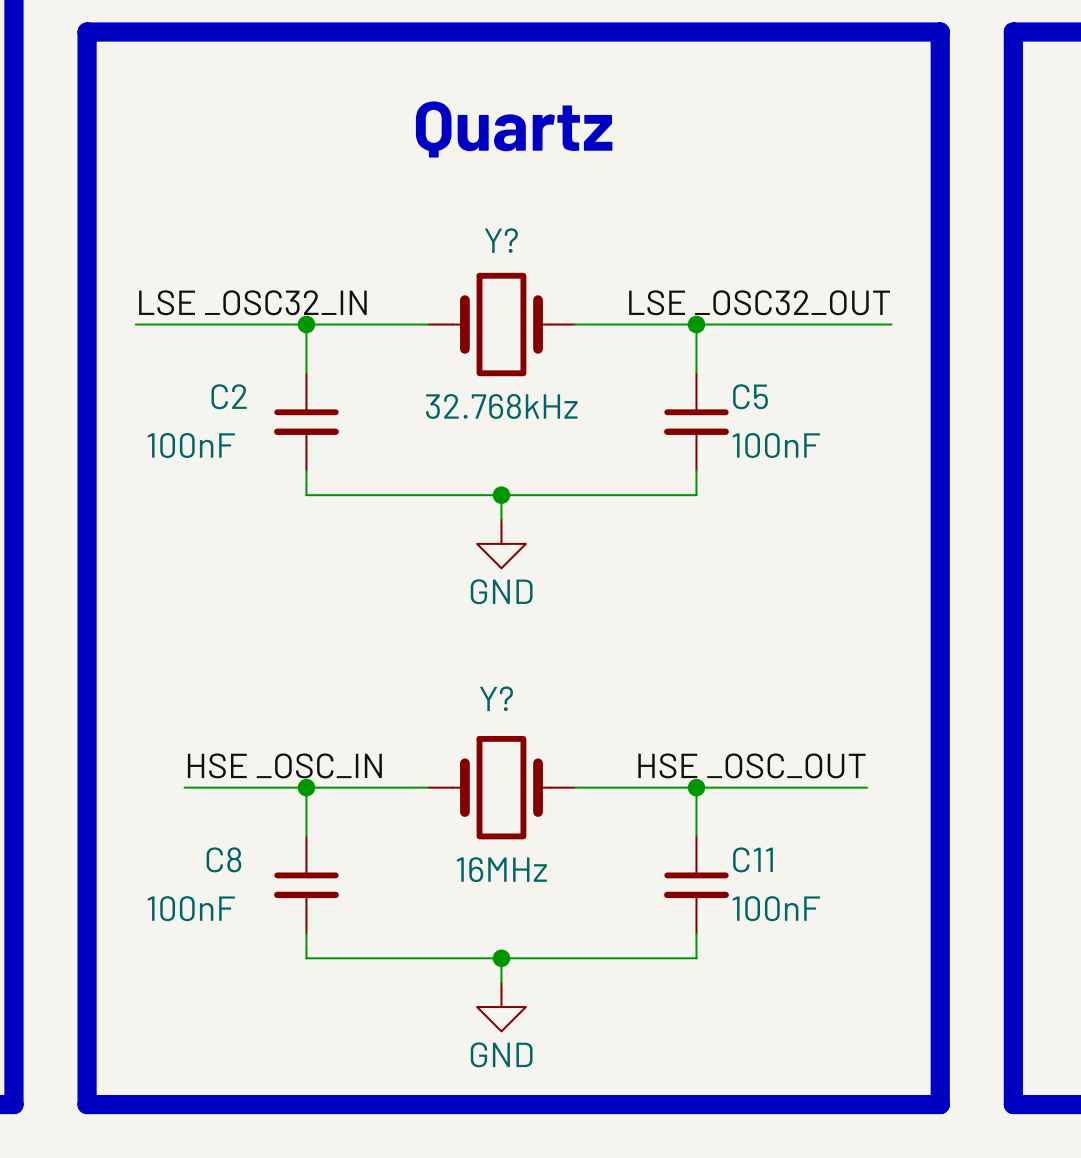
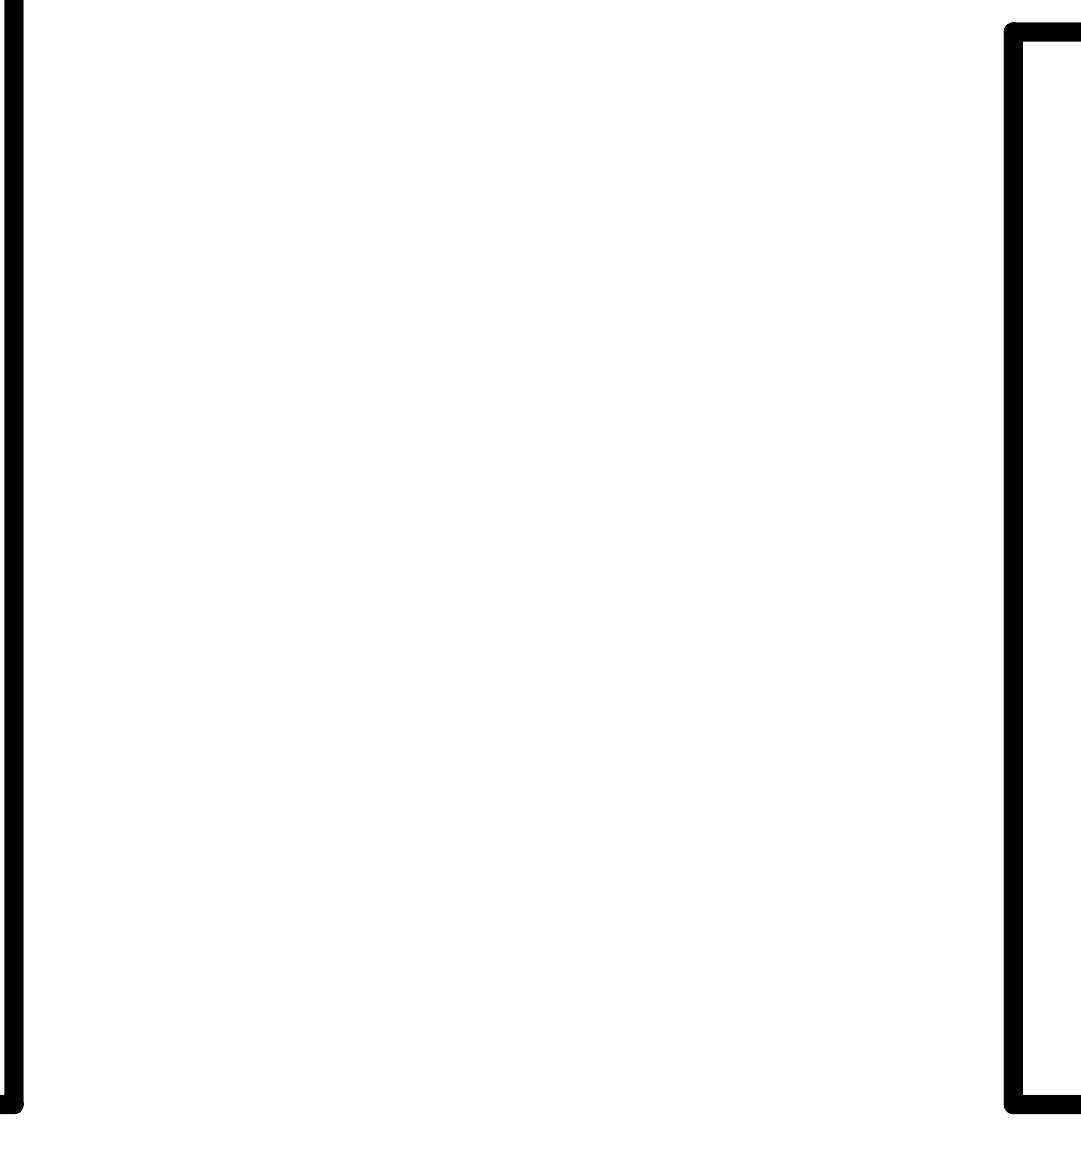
line: (87, 32) (87, 1104) (940, 1104) (940, 32) (87, 32) -> none
text: Quartz (514, 129) -> none
label: LSE _OSC32_IN (252, 302) -> none
label: LSE _OSC32_OUT (759, 302) -> none
wire: (135, 324) (428, 324) -> none
wire: (306, 324) (306, 373) -> none
junction: (306, 324) -> none
Y?: 32.768kHz (501, 324) -> none
wire: (574, 324) (891, 324) -> none
wire: (696, 324) (696, 373) -> none
junction: (696, 324) -> none
C2: 100nF (306, 422) -> none
C5: 100nF (696, 422) -> none
wire: (306, 470) (306, 495) (696, 495) (696, 470) -> none
wire: (501, 495) (501, 519) -> none
junction: (501, 495) -> none
power symbol: GND (501, 543) -> none
label: HSE _OSC_IN (284, 765) -> none
label: HSE _OSC_OUT (751, 765) -> none
wire: (184, 787) (428, 787) -> none
wire: (306, 787) (306, 836) -> none
junction: (306, 787) -> none
Y?: 16MHz (501, 787) -> none
wire: (574, 787) (867, 787) -> none
wire: (696, 787) (696, 836) -> none
junction: (696, 787) -> none
C8: 100nF (306, 885) -> none
C11: 100nF (696, 885) -> none
wire: (306, 933) (306, 958) (696, 958) (696, 933) -> none
wire: (501, 958) (501, 982) -> none
junction: (501, 958) -> none
power symbol: GND (501, 1007) -> none

